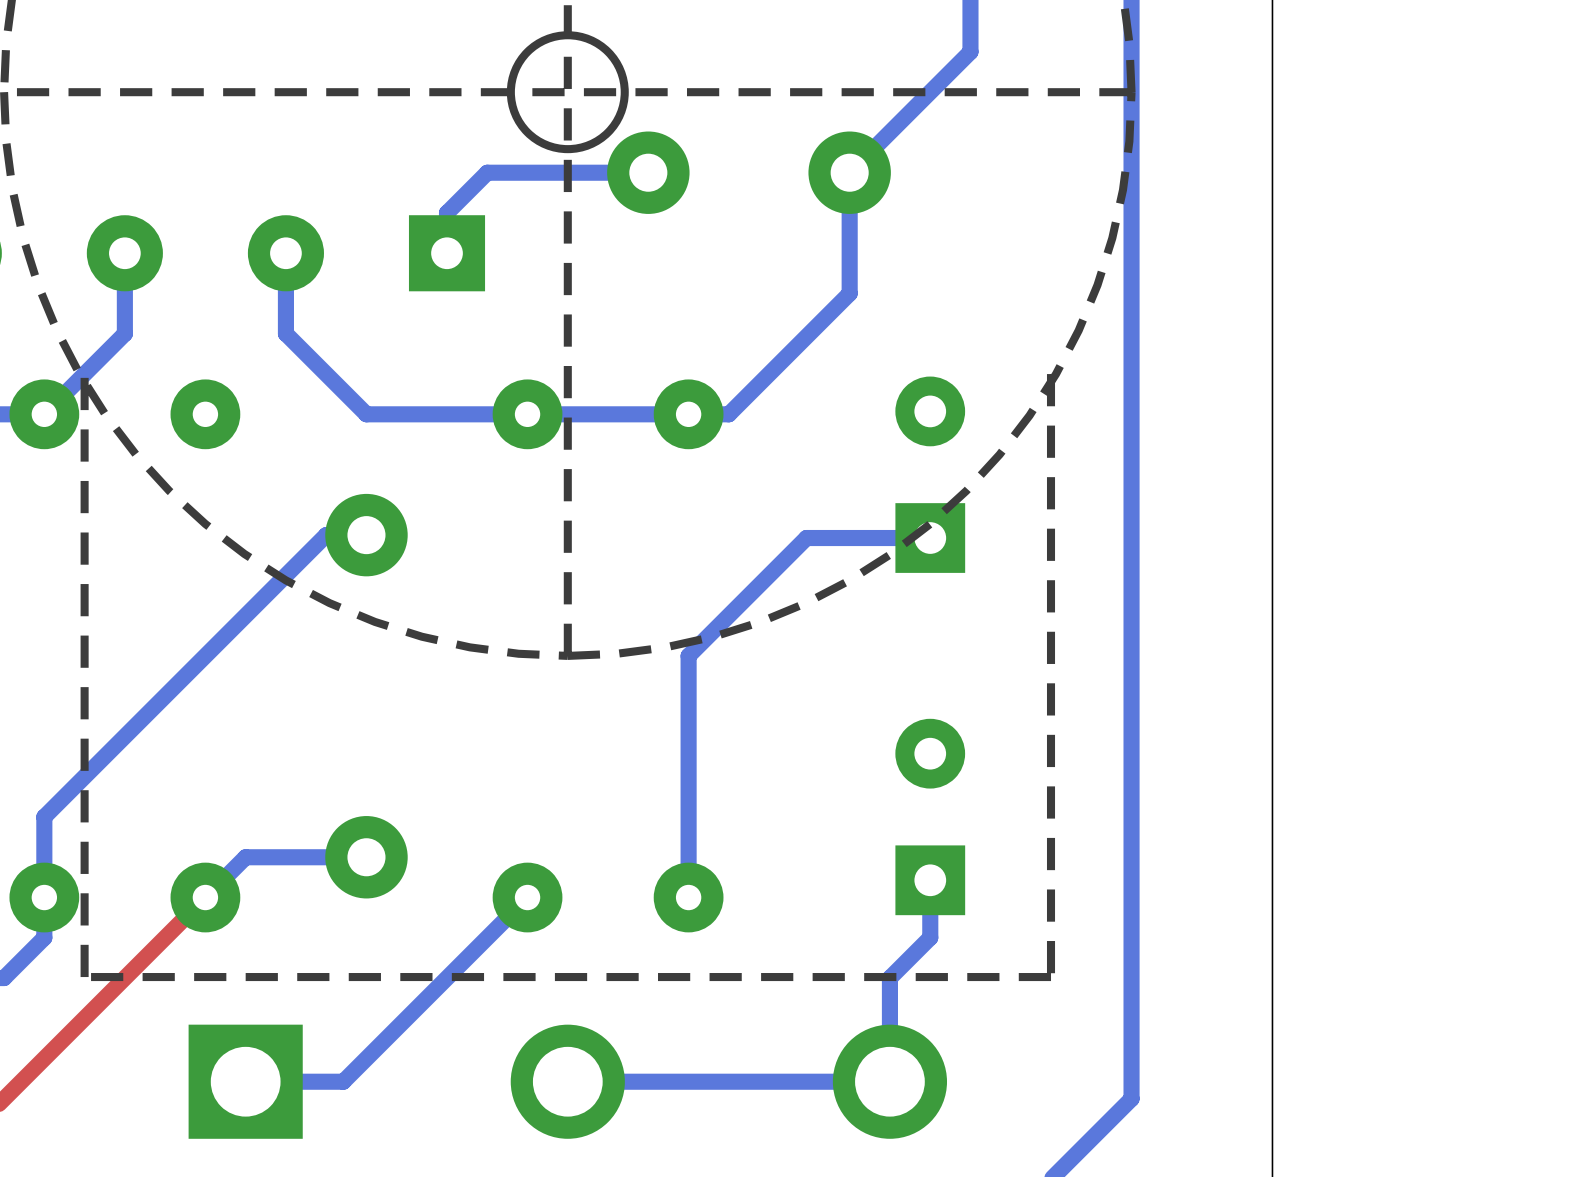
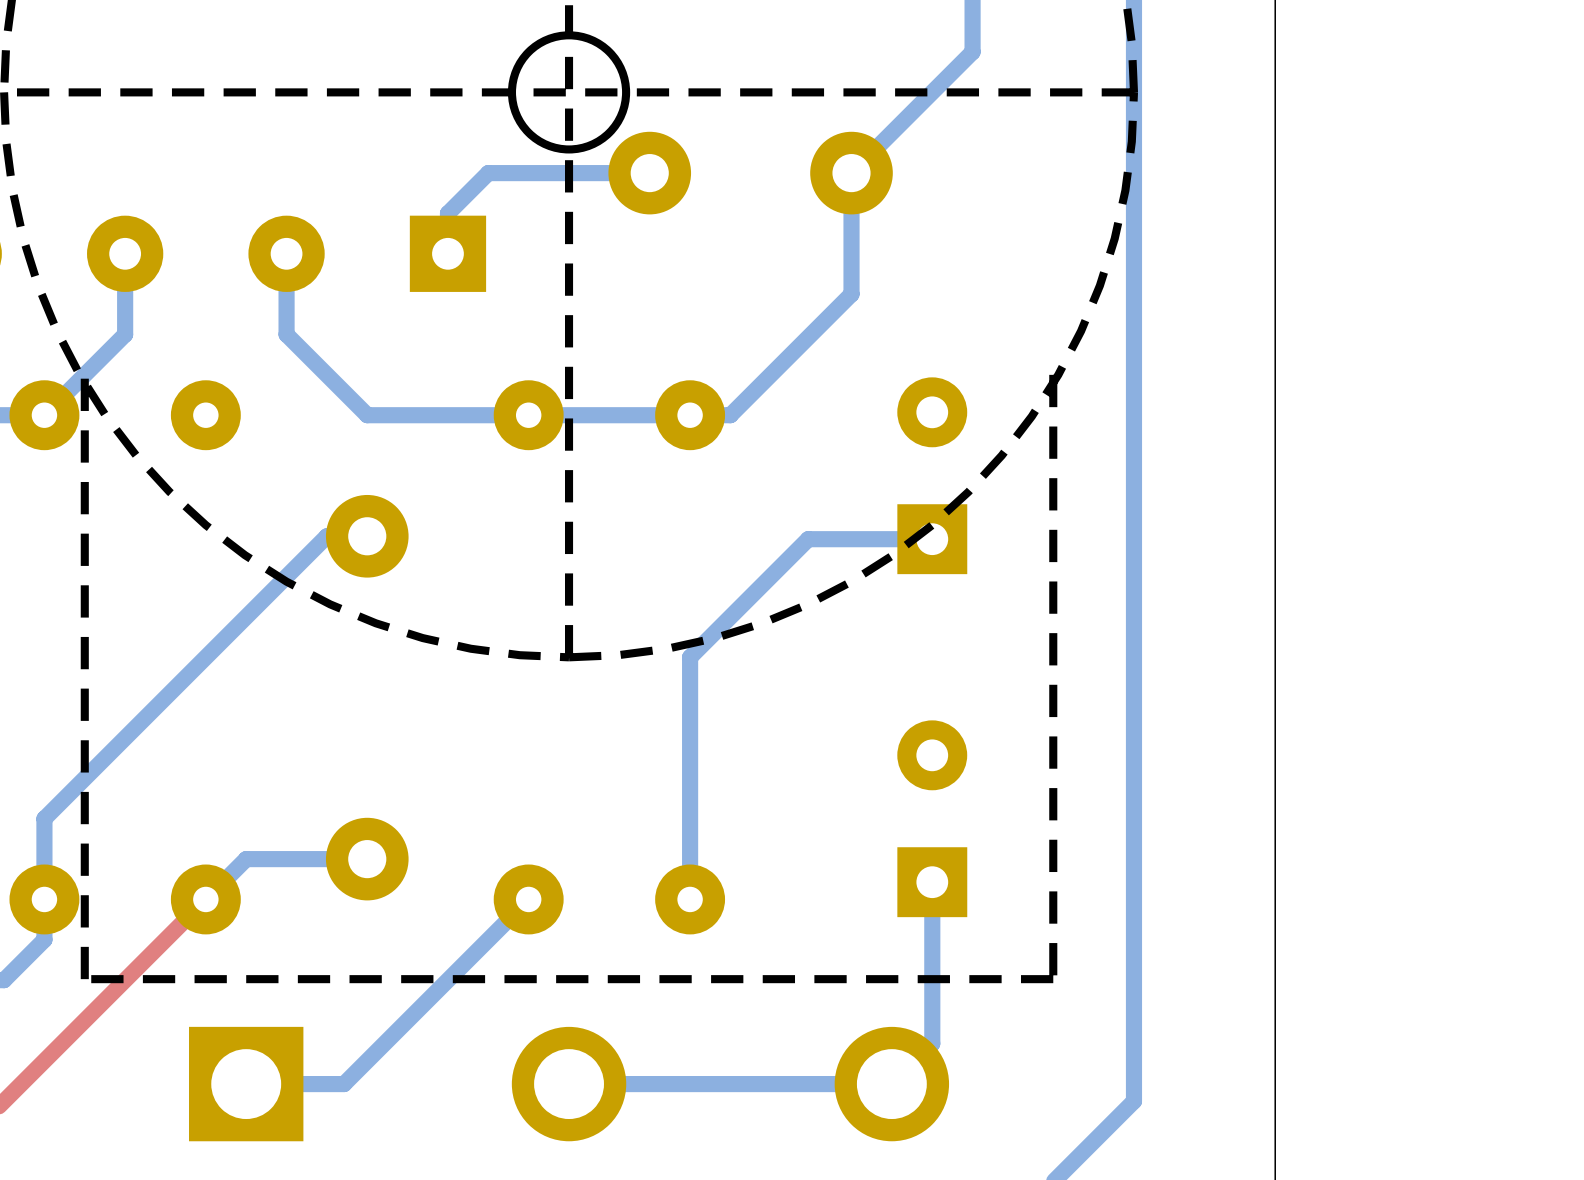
bottom track: (930, 937) (889, 978) (889, 1081) -> (932, 939) (932, 1043) (891, 1084)

